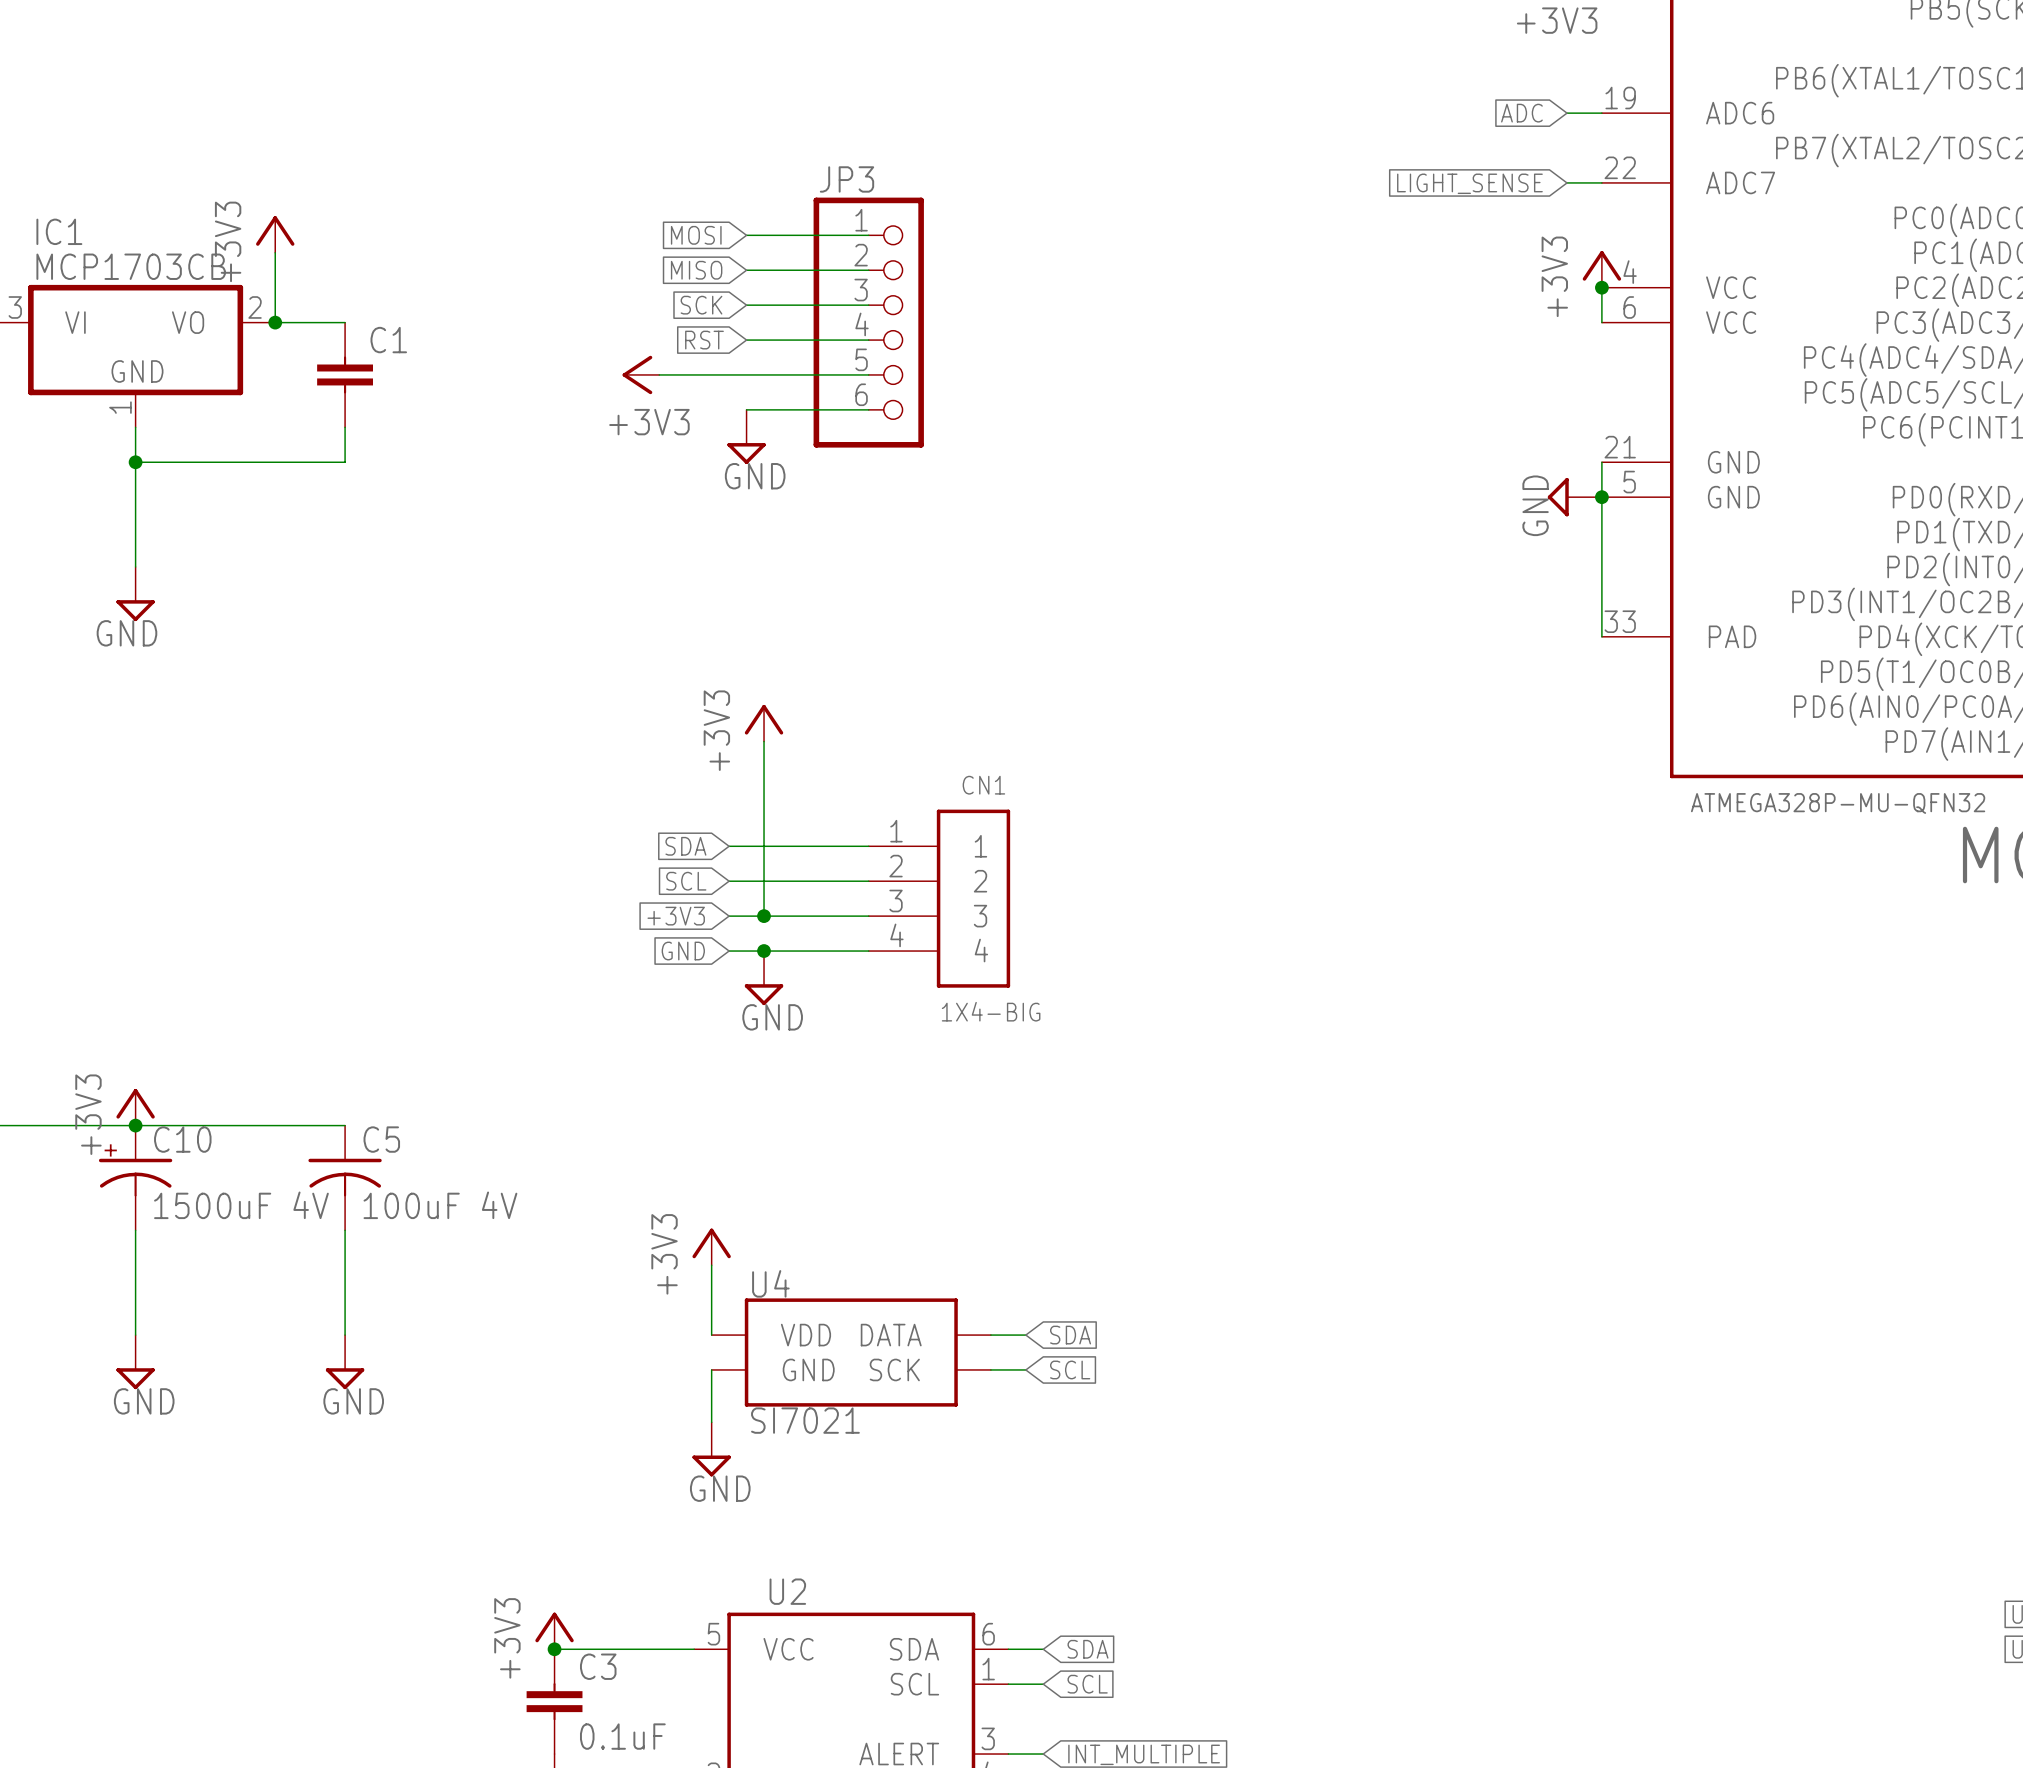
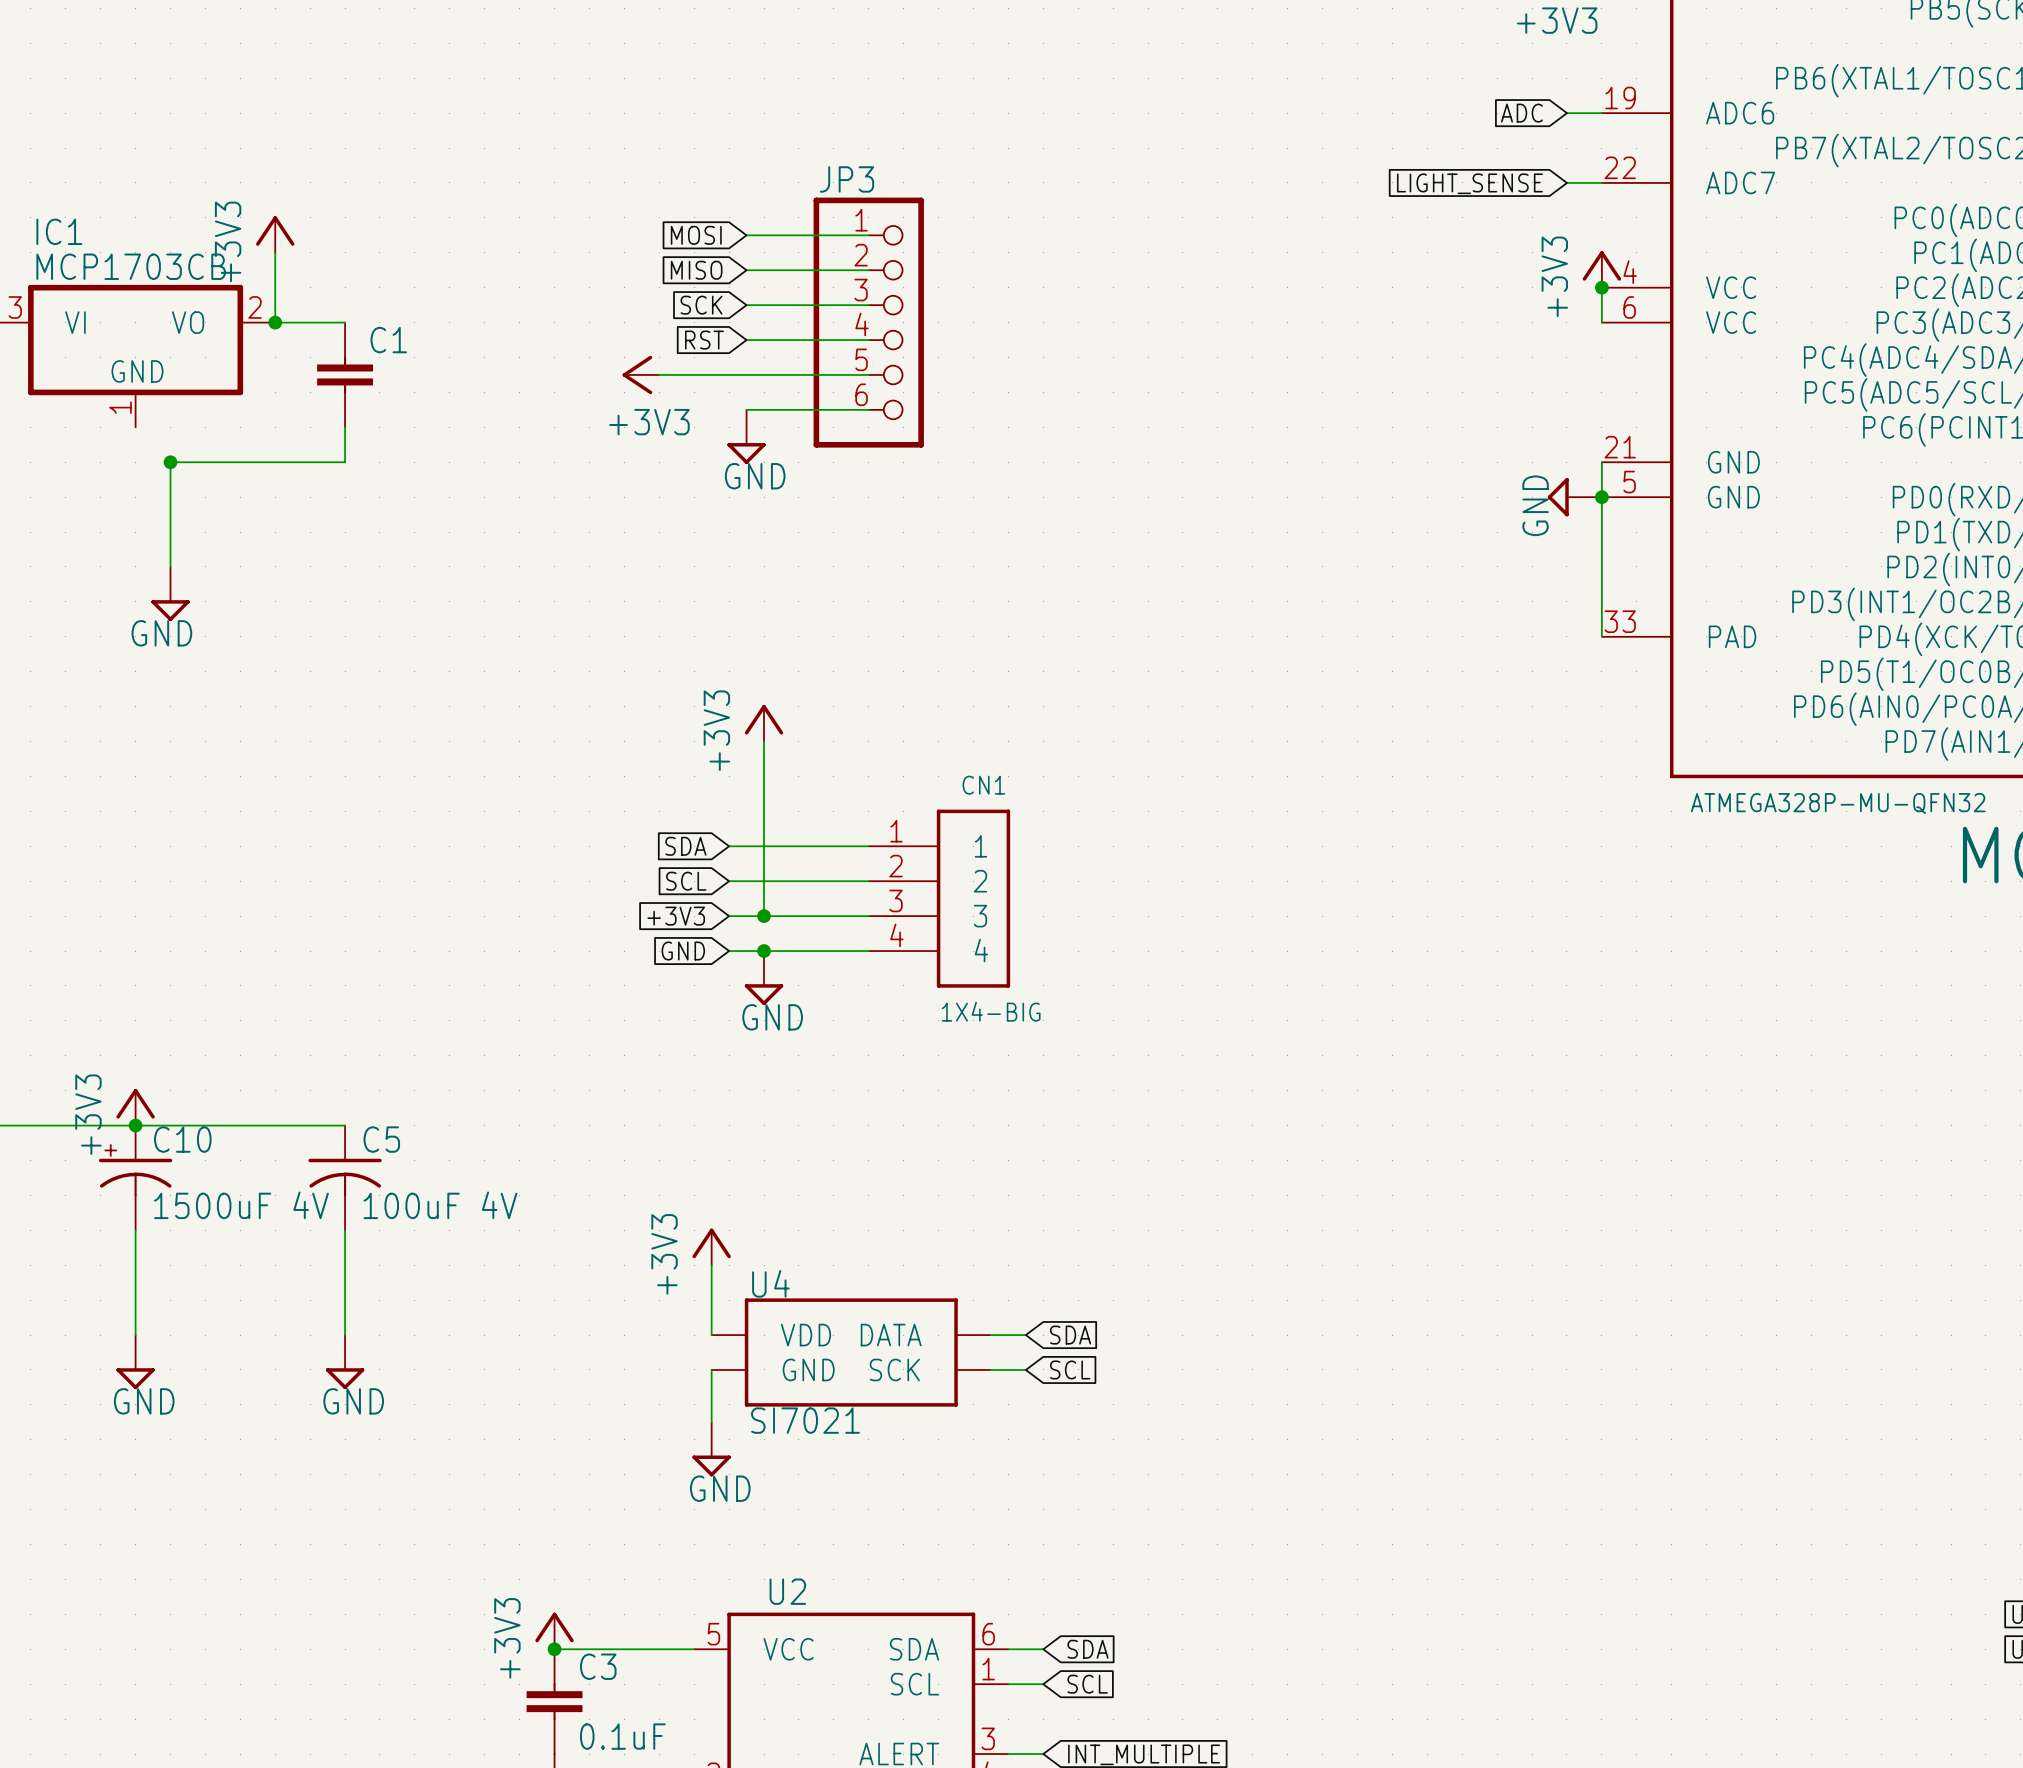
wire: (135, 427) (135, 566) -> none
wire: (135, 462) (170, 462) -> (170, 566) (170, 462)
junction position: (135, 462) -> (170, 462)
power symbol position: GND (135, 594) -> GND (170, 594)

